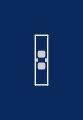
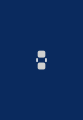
line: (35, 35) (47, 35) (47, 84) (35, 84) (35, 35) -> none

